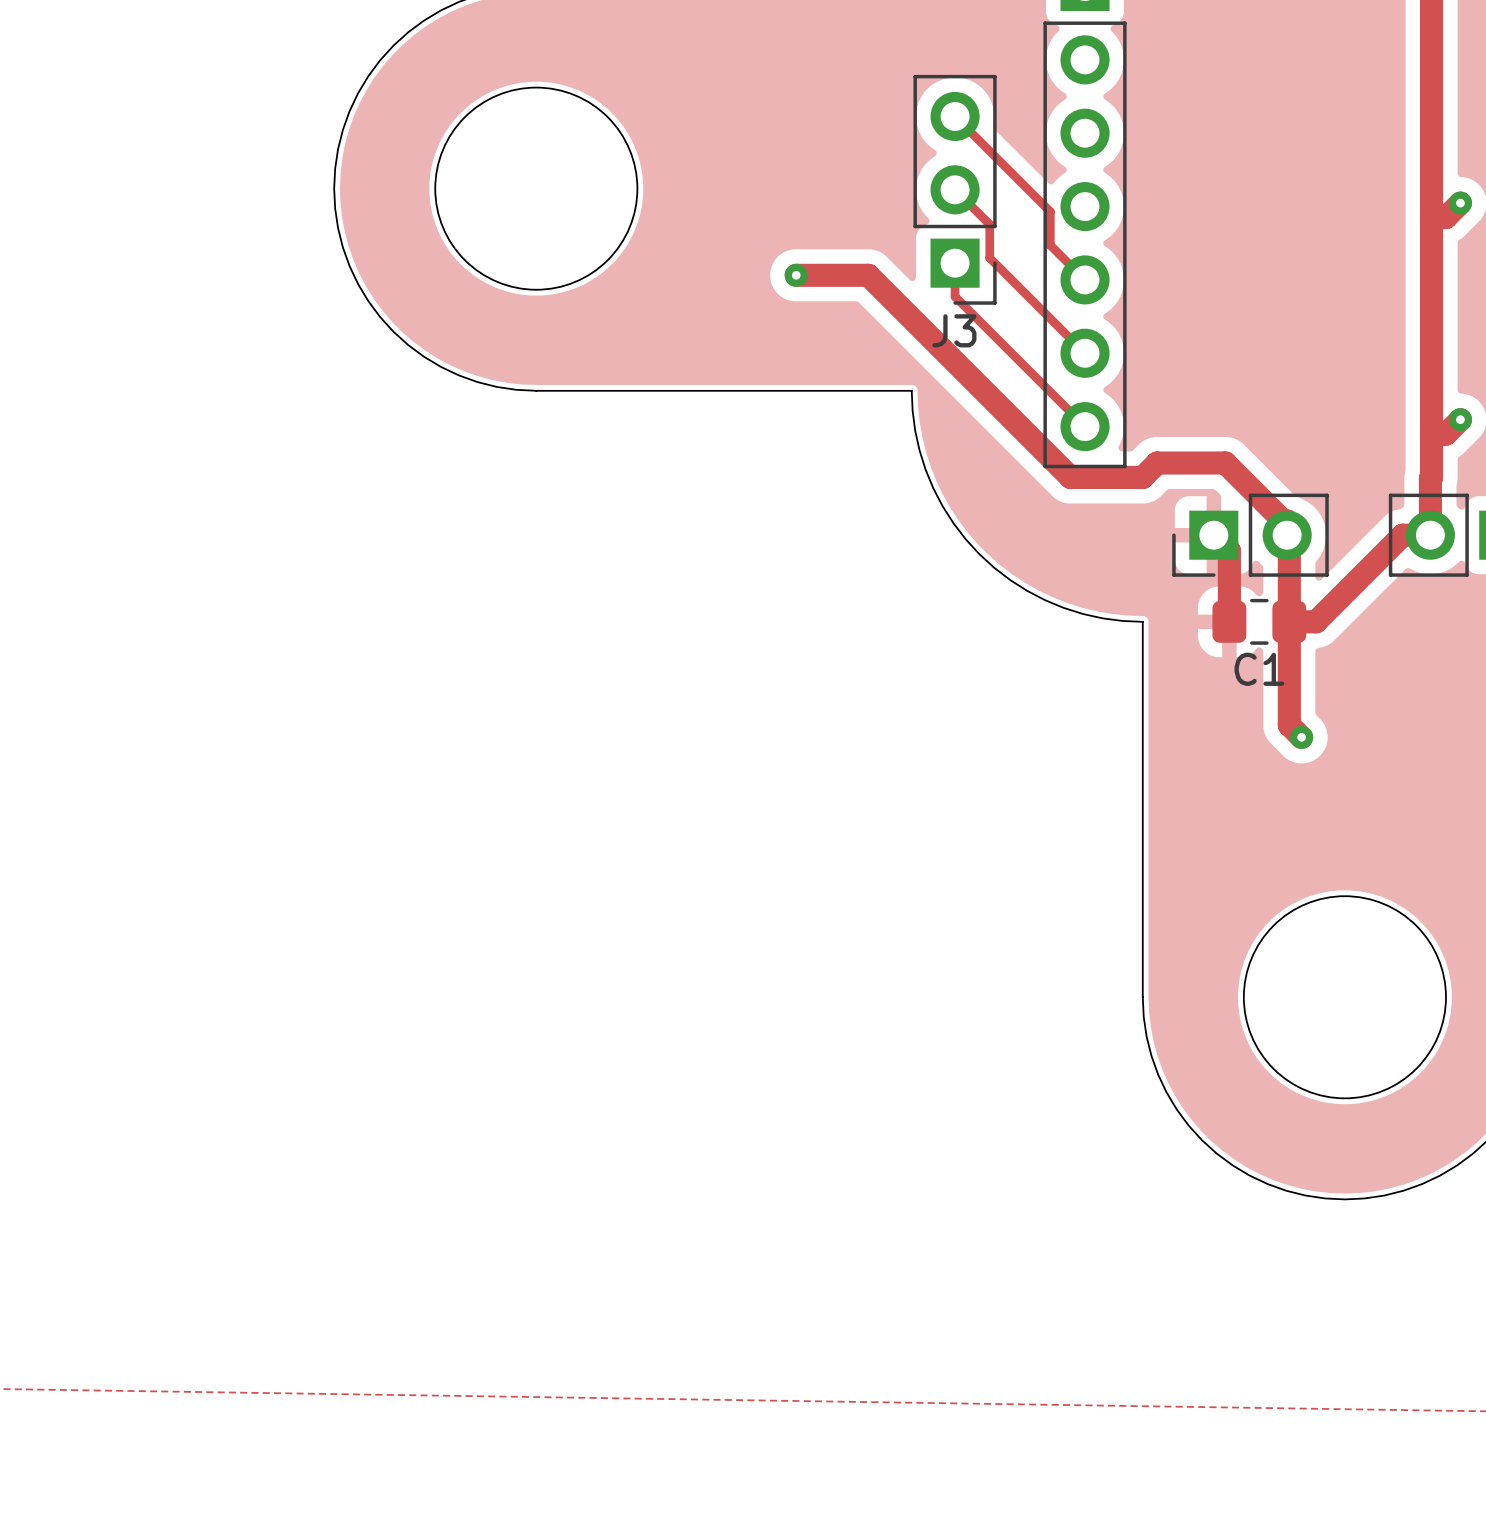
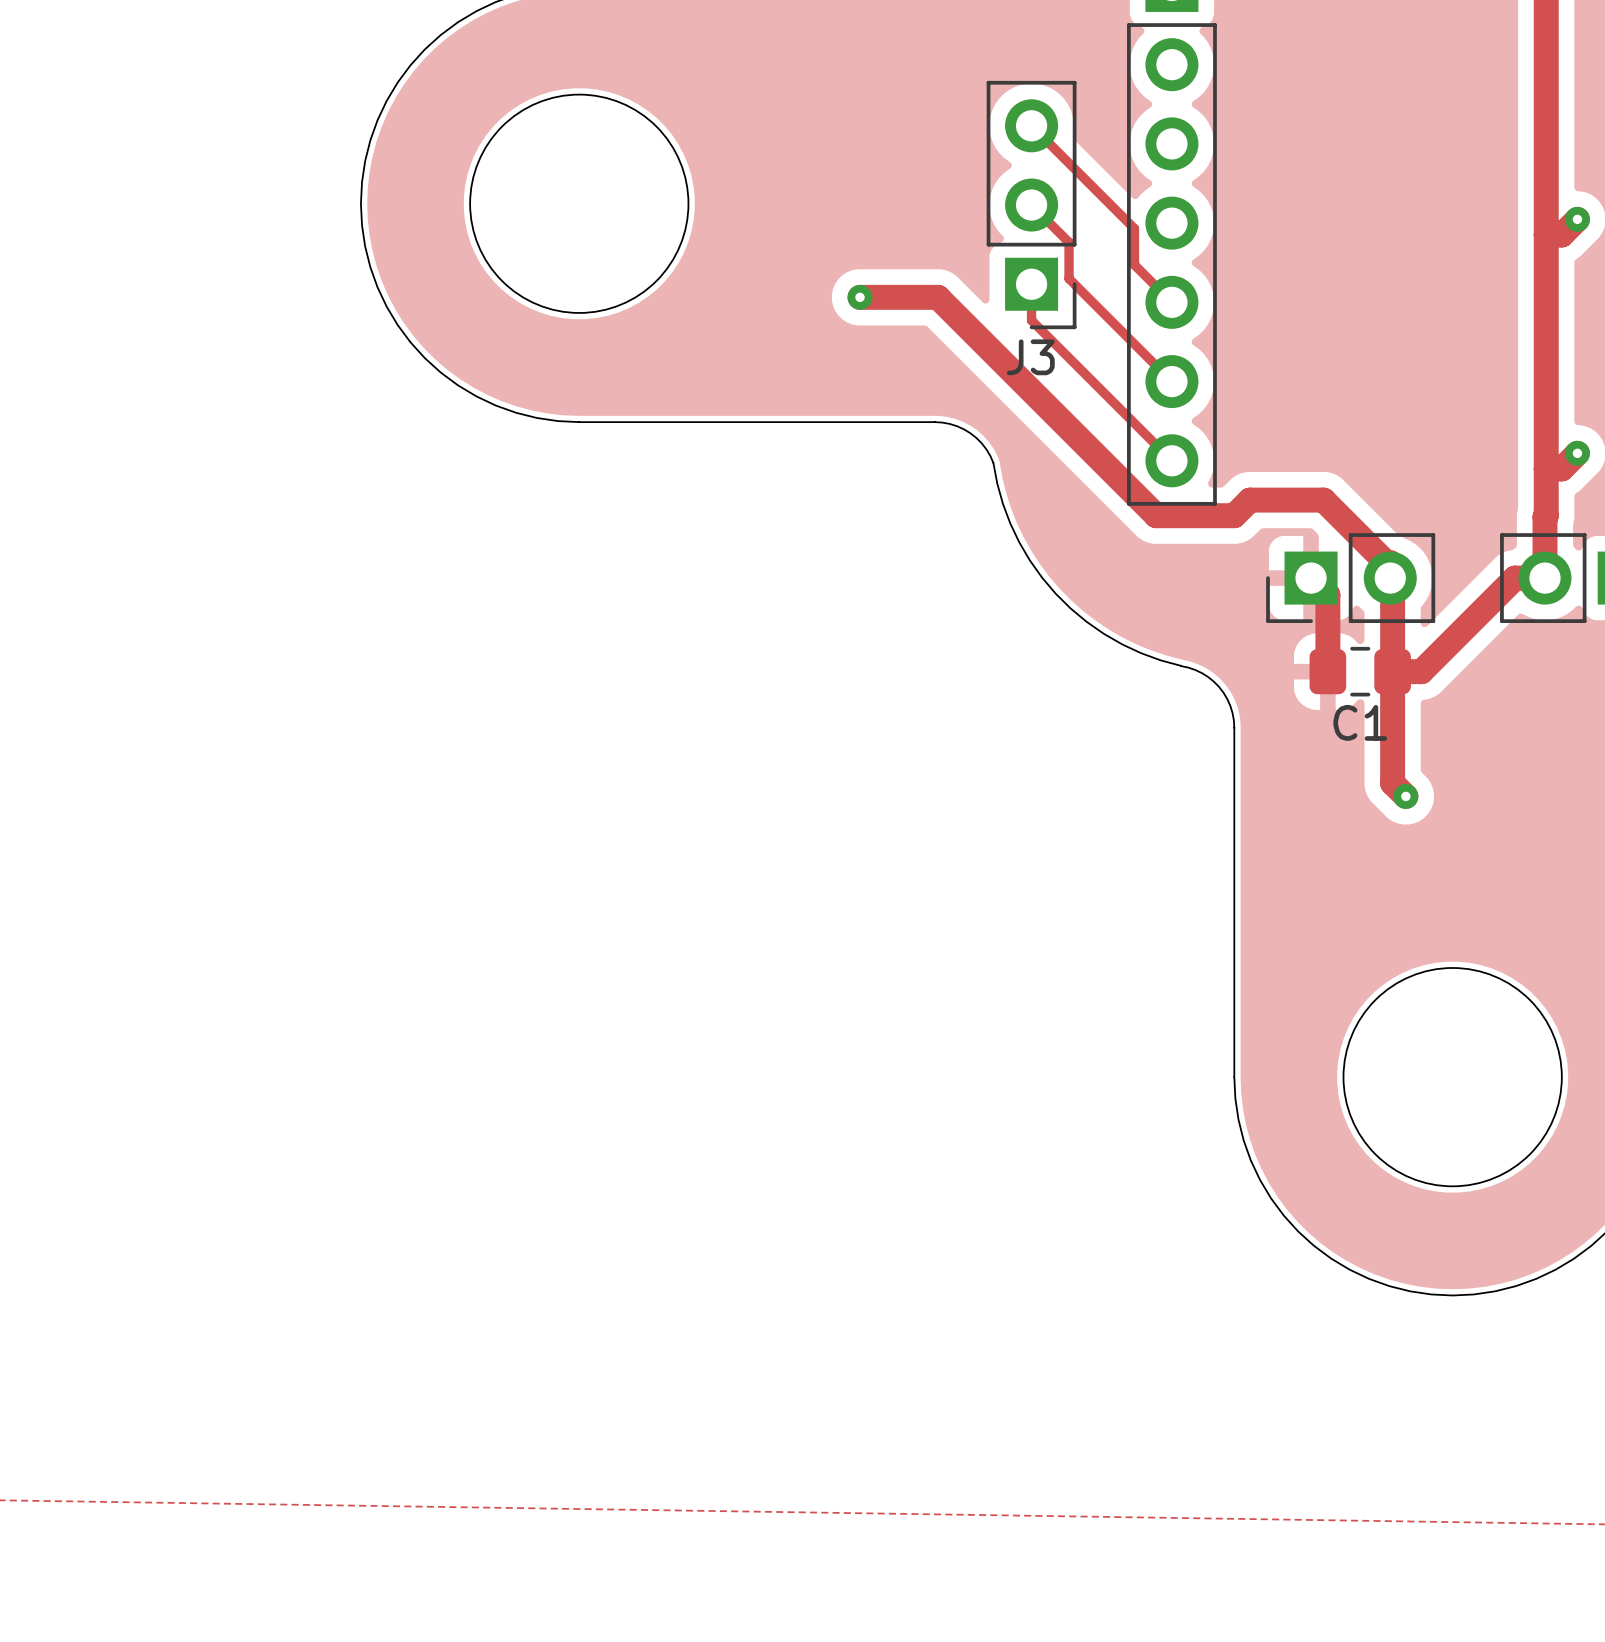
board edge: (865, 390) (911, 390) (915, 430) (919, 450) (933, 488) (942, 506) (965, 539) (994, 567) (1027, 590) (1063, 607) (1102, 618) (1142, 621) (1142, 673) -> (934, 422) (949, 423) (964, 429) (976, 438) (986, 449) (993, 462) (1002, 503) (1019, 542) (1042, 577) (1070, 608) (1103, 633) (1122, 644) (1141, 653) (1181, 665)
board edge: none -> (1181, 666) (1202, 673) (1219, 687) (1230, 706) (1234, 727)

